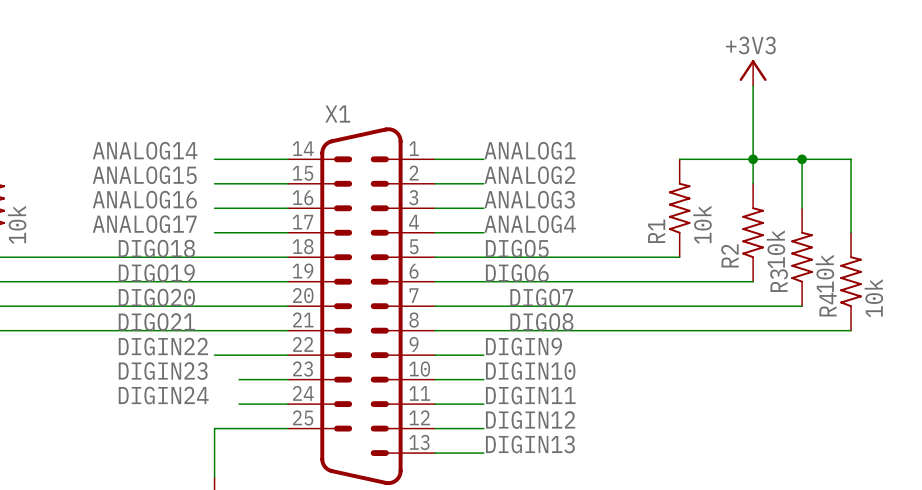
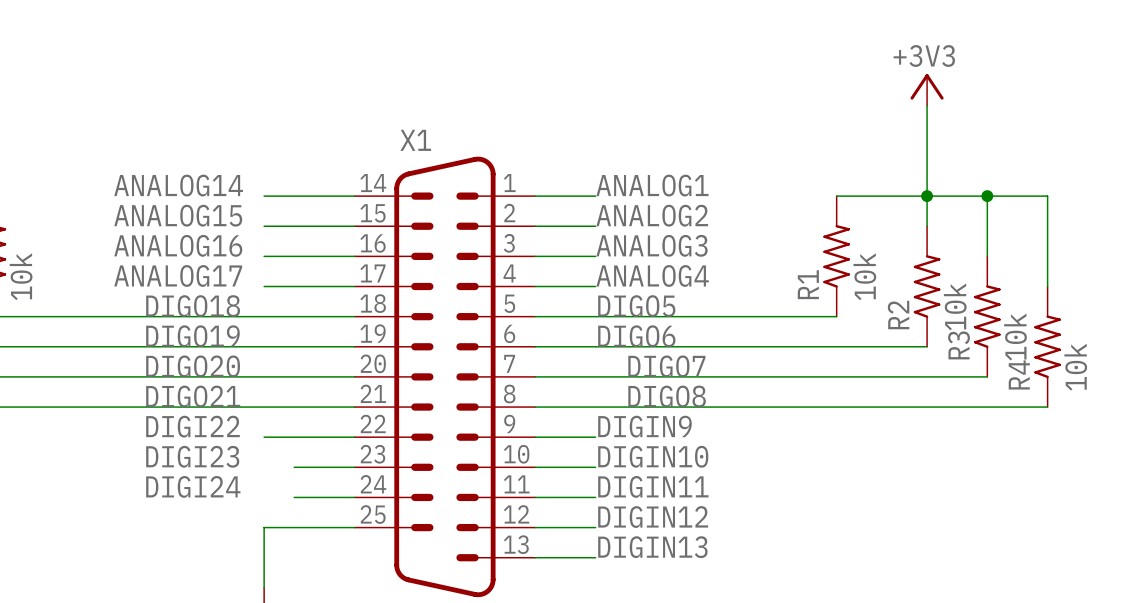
label: DIGIN22 (163, 346) -> DIGI22 (192, 426)
label: DIGIN23 (163, 371) -> DIGI23 (192, 456)
label: DIGIN24 (163, 395) -> DIGI24 (193, 486)

